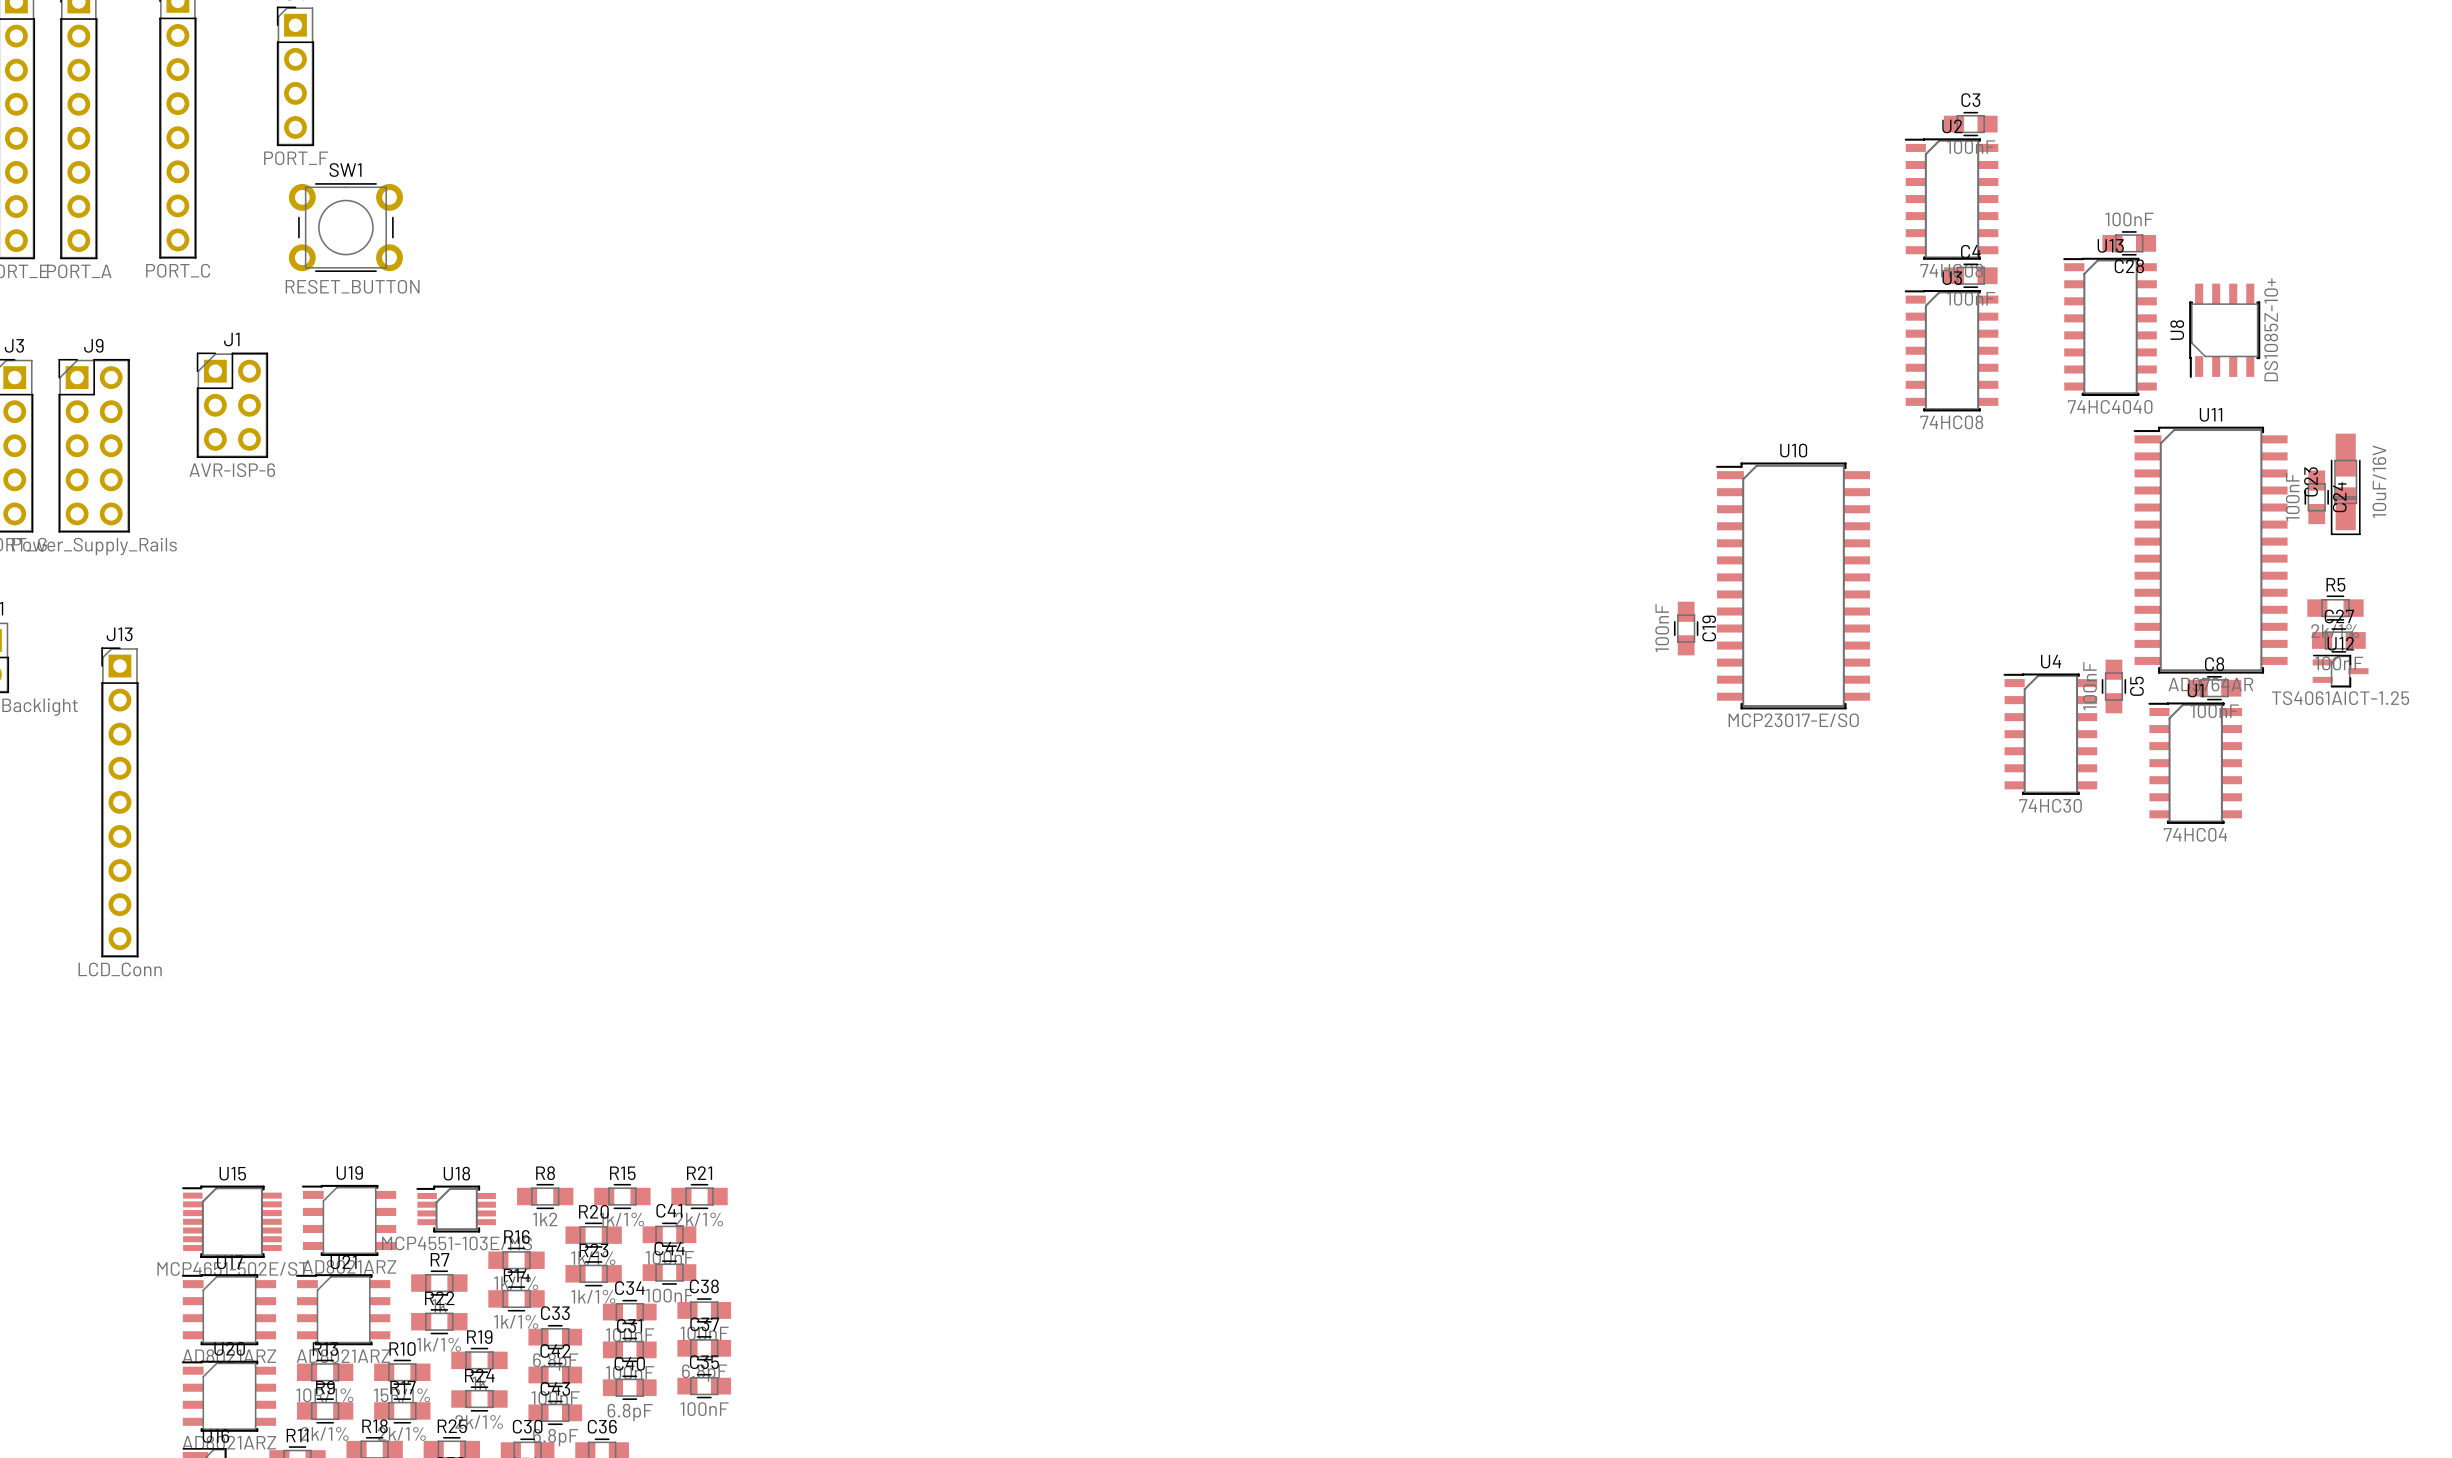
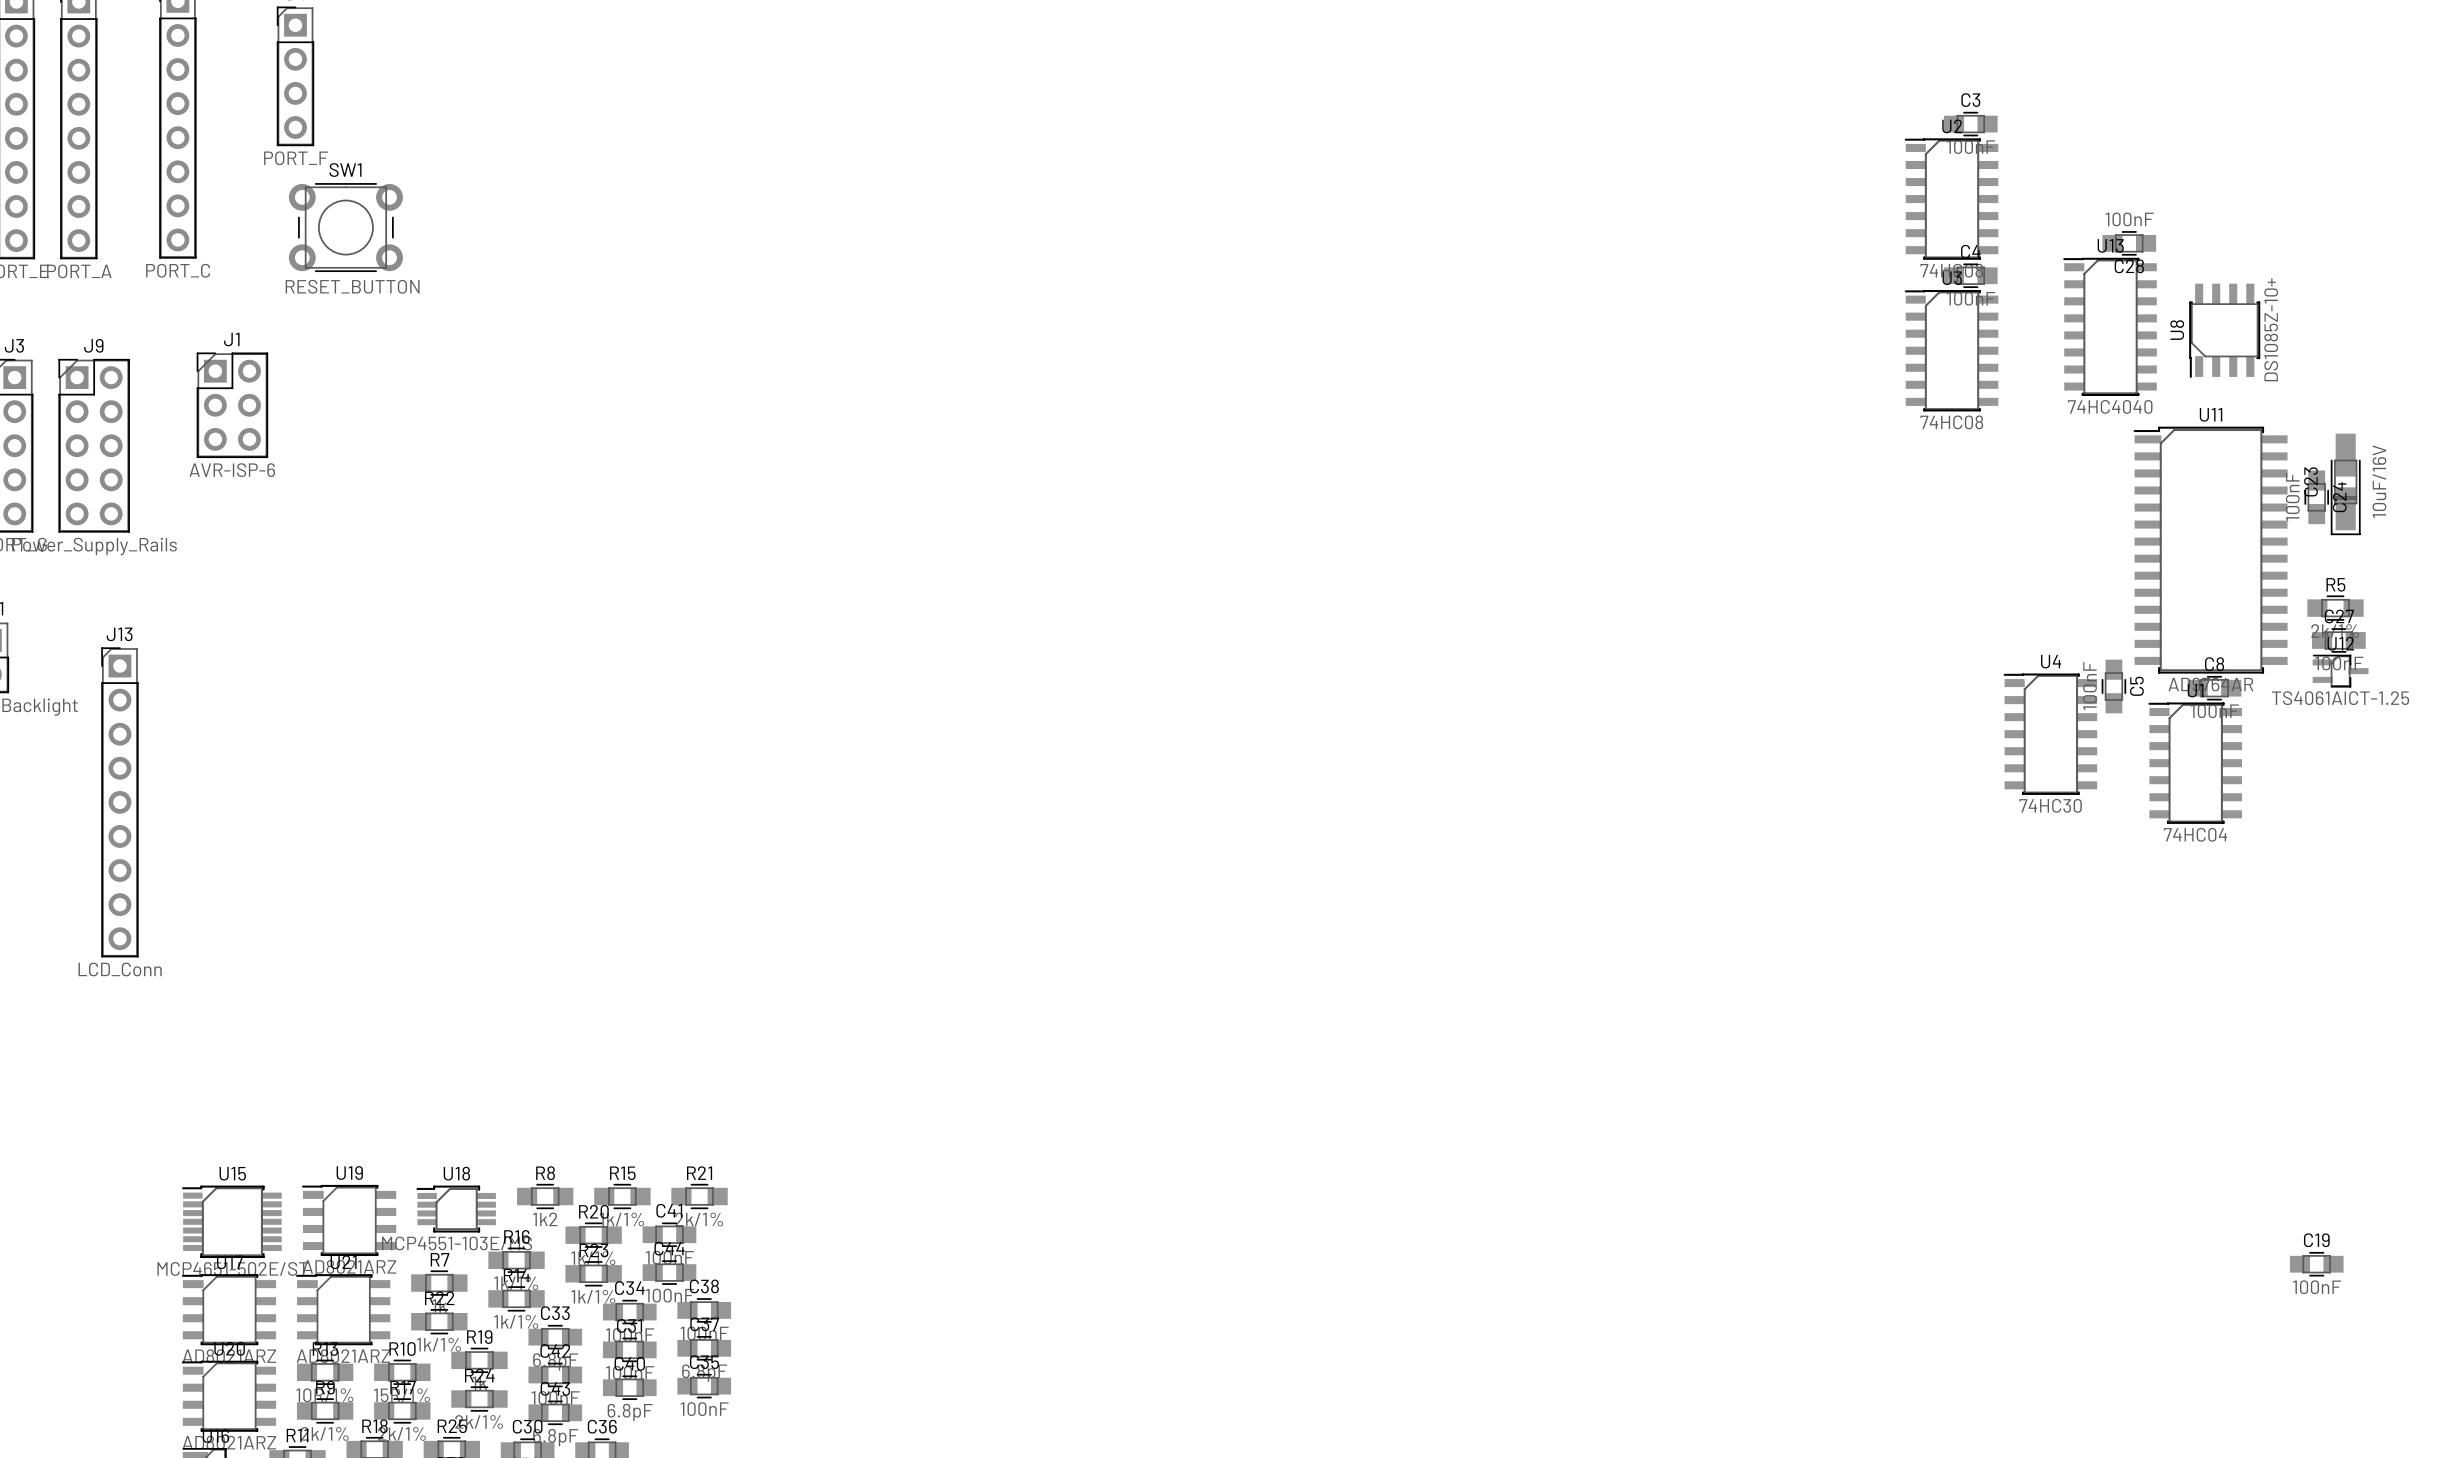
U10: MCP23017-E/SO (1793, 585) -> none
C19 value position: 100nF (1662, 628) -> 100nF (2317, 1287)
C19 rotation: 0° (1686, 628) -> 90° clockwise (2316, 1264)
C19 position: (1686, 628) -> (2316, 1264)
C19 name position: C19 (1709, 628) -> C19 (2316, 1240)

